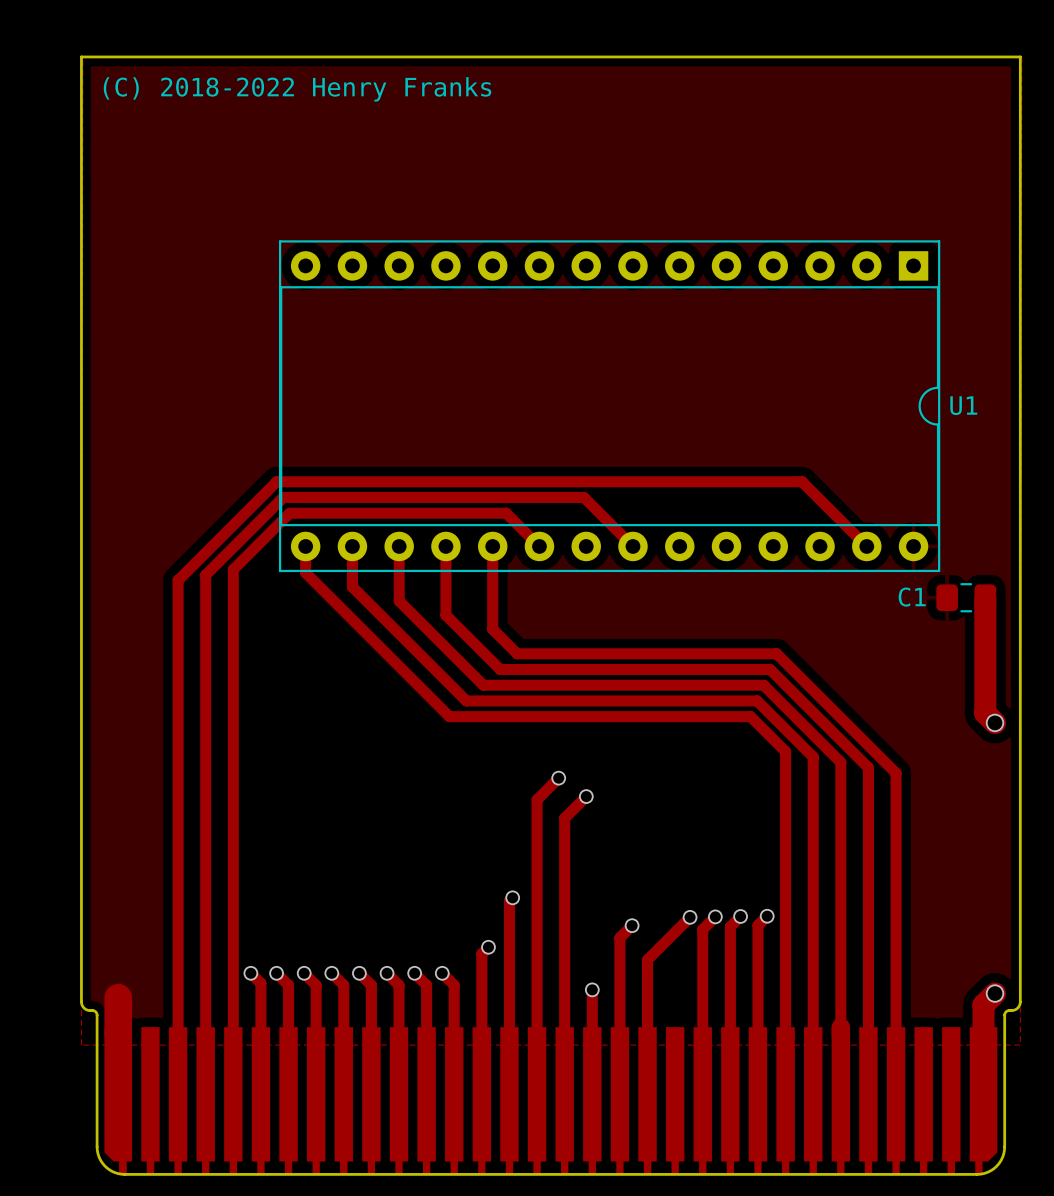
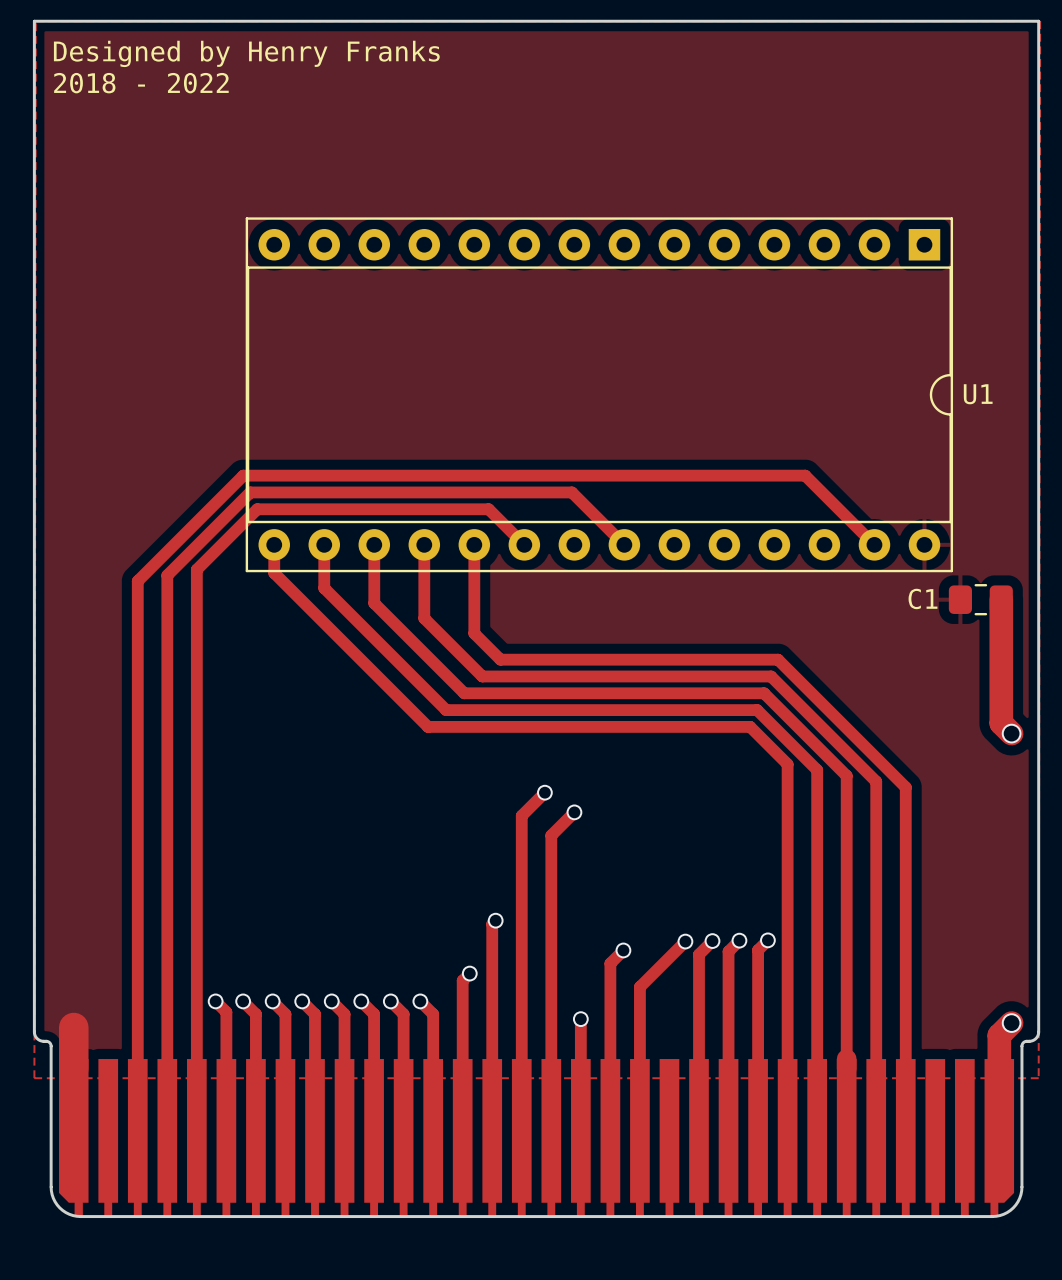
text: (C) 2018-2022 Henry Franks (297, 89) -> Designed by Henry Franks (246, 53)
text: none -> 2018 - 2022 (141, 83)

